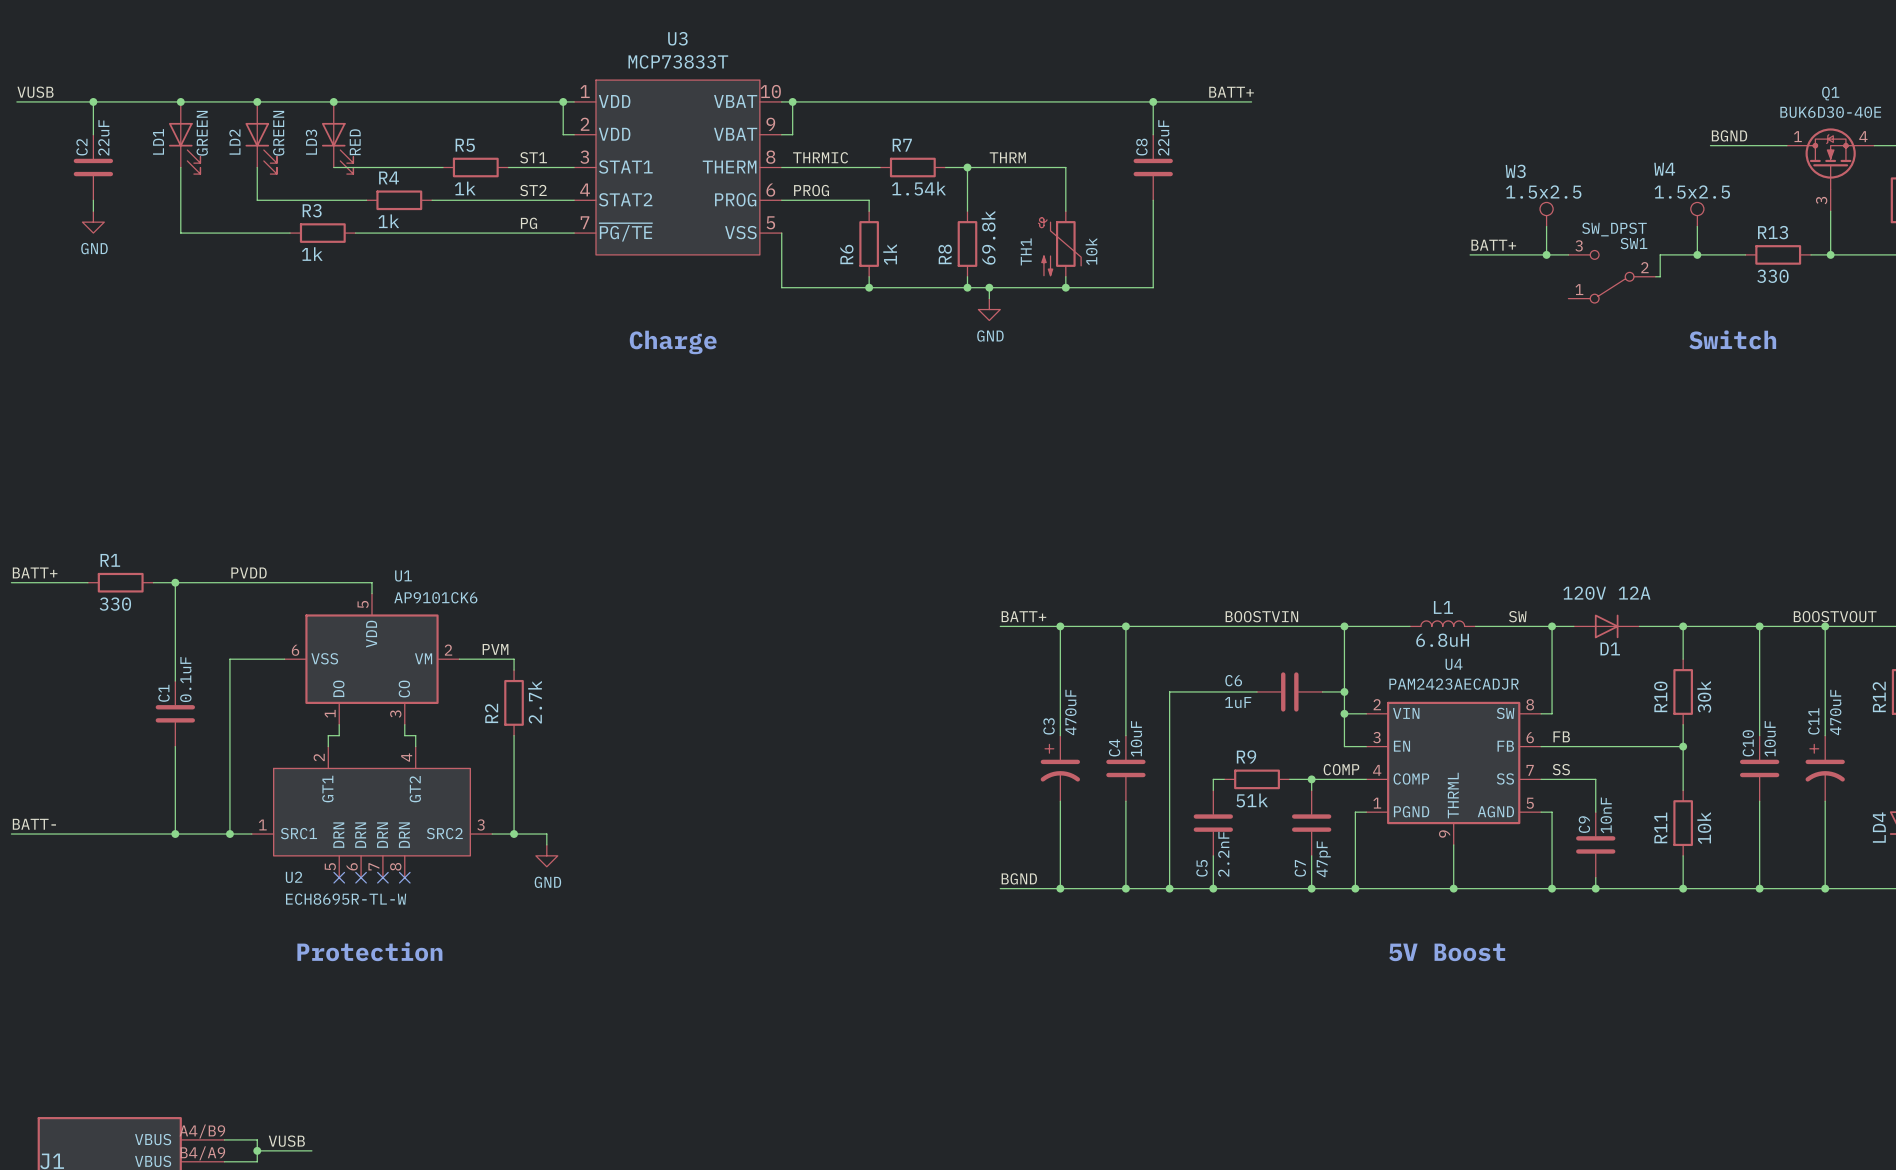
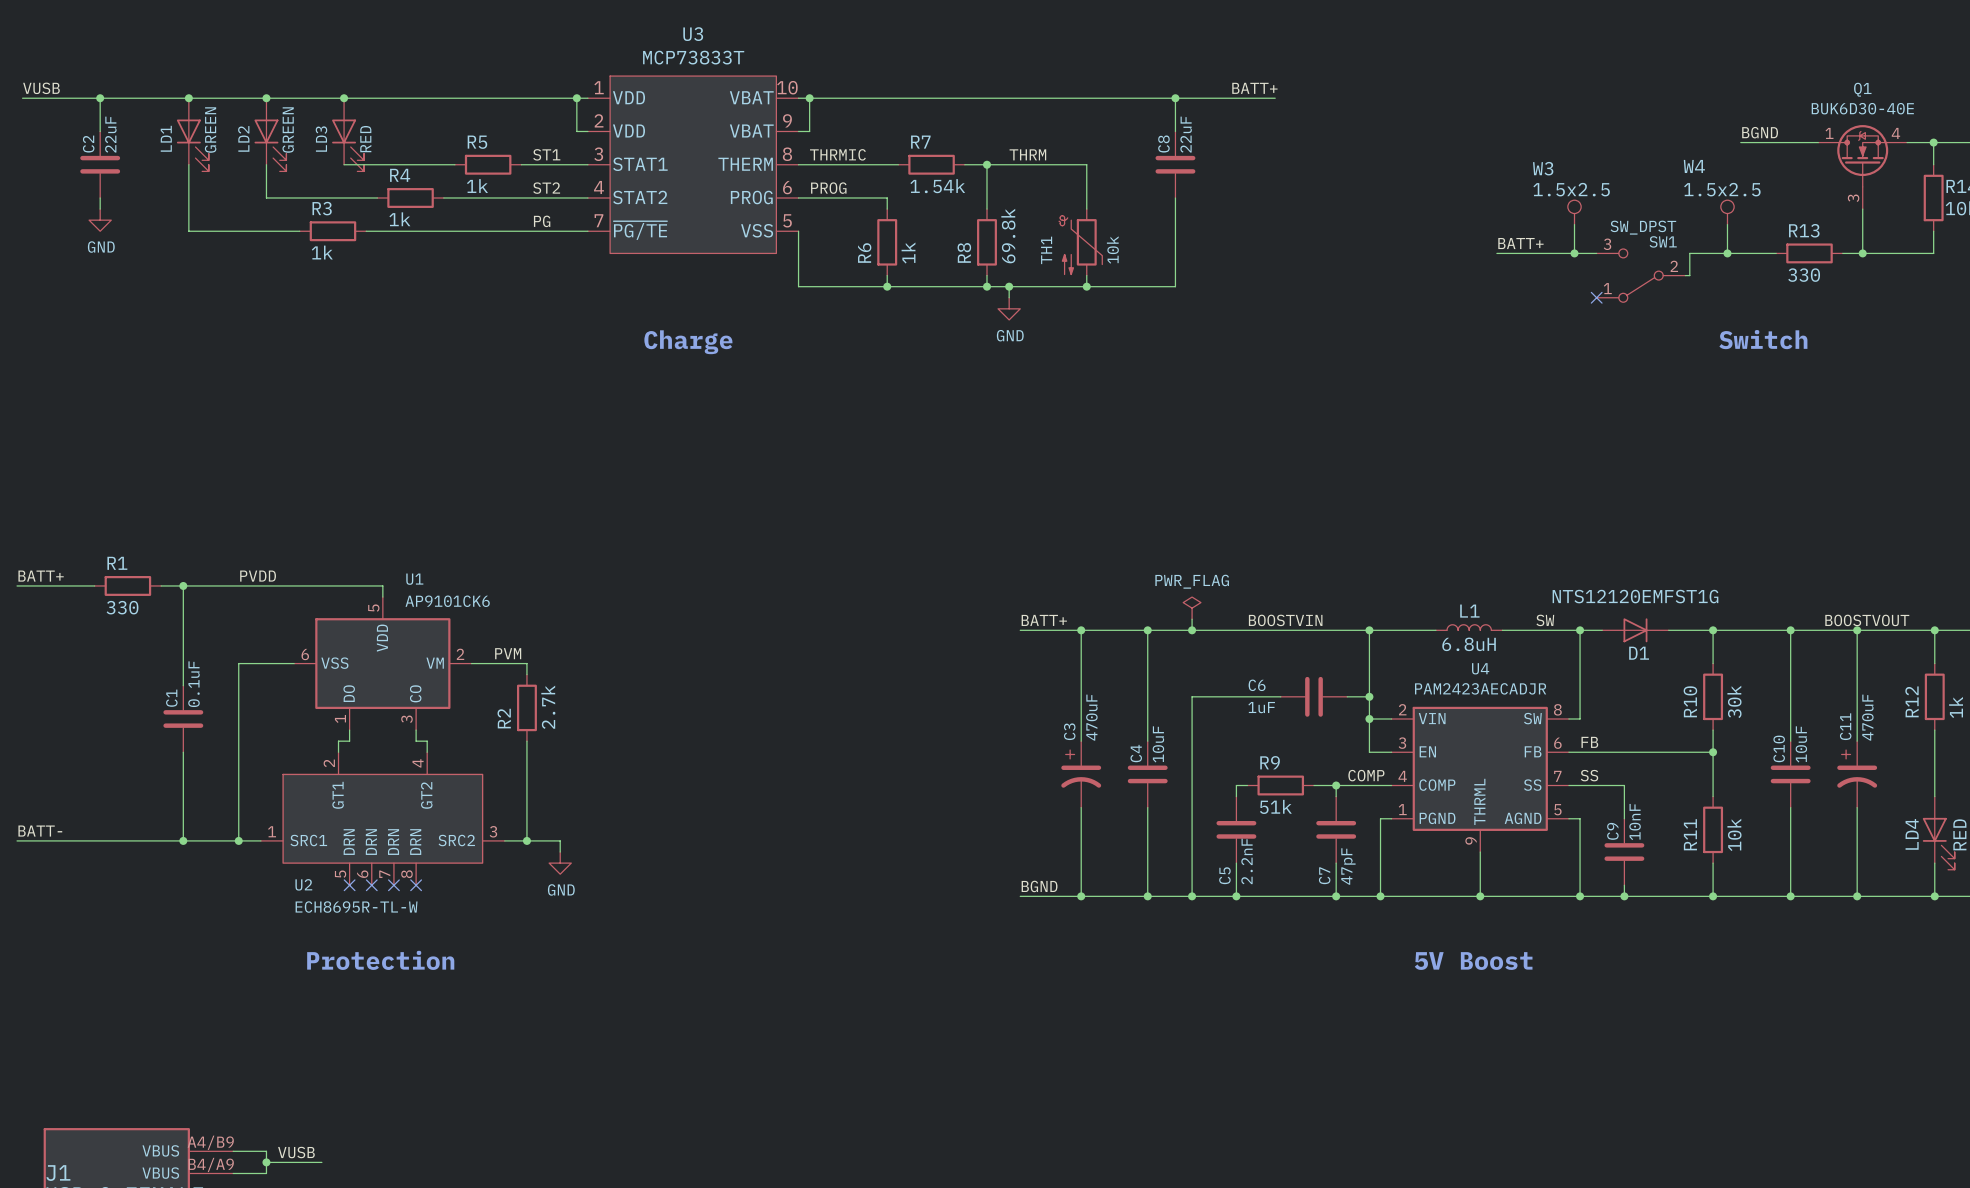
no-connect mark: none -> (1596, 297)
D1 value: 120V 12A (1606, 593) -> NTS12120EMFST1G (1635, 596)
power symbol: none -> PWR_FLAG (1192, 608)
wire: none -> (1192, 619) (1192, 630)
junction: none -> (1192, 630)

